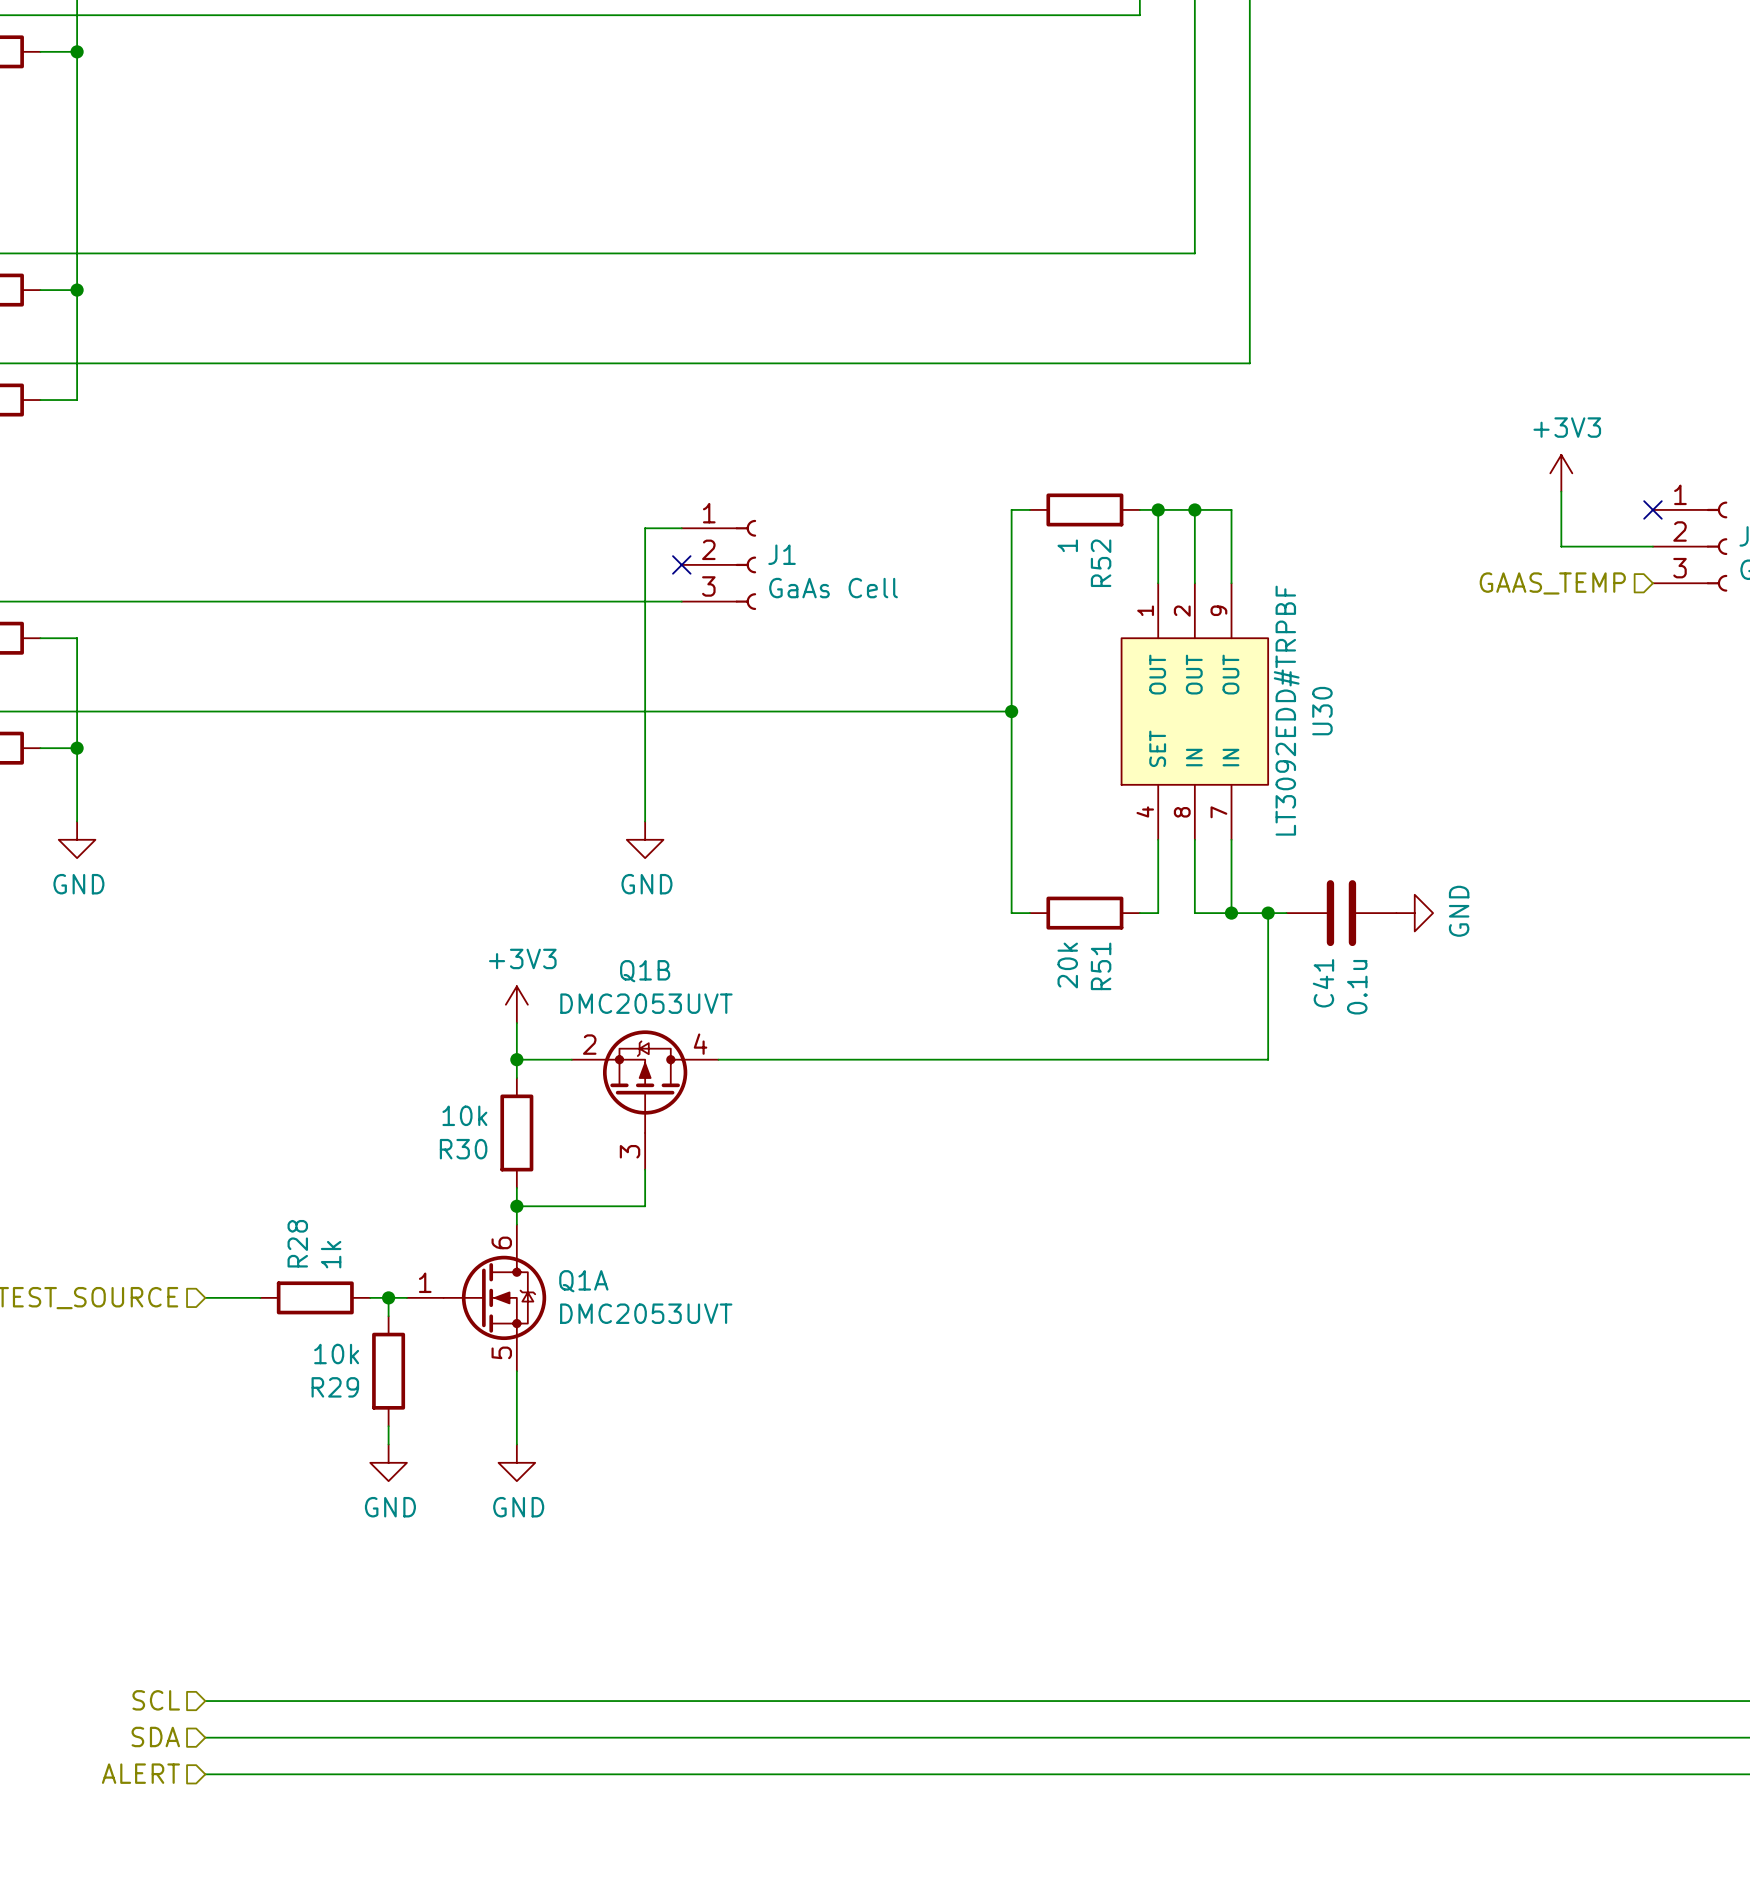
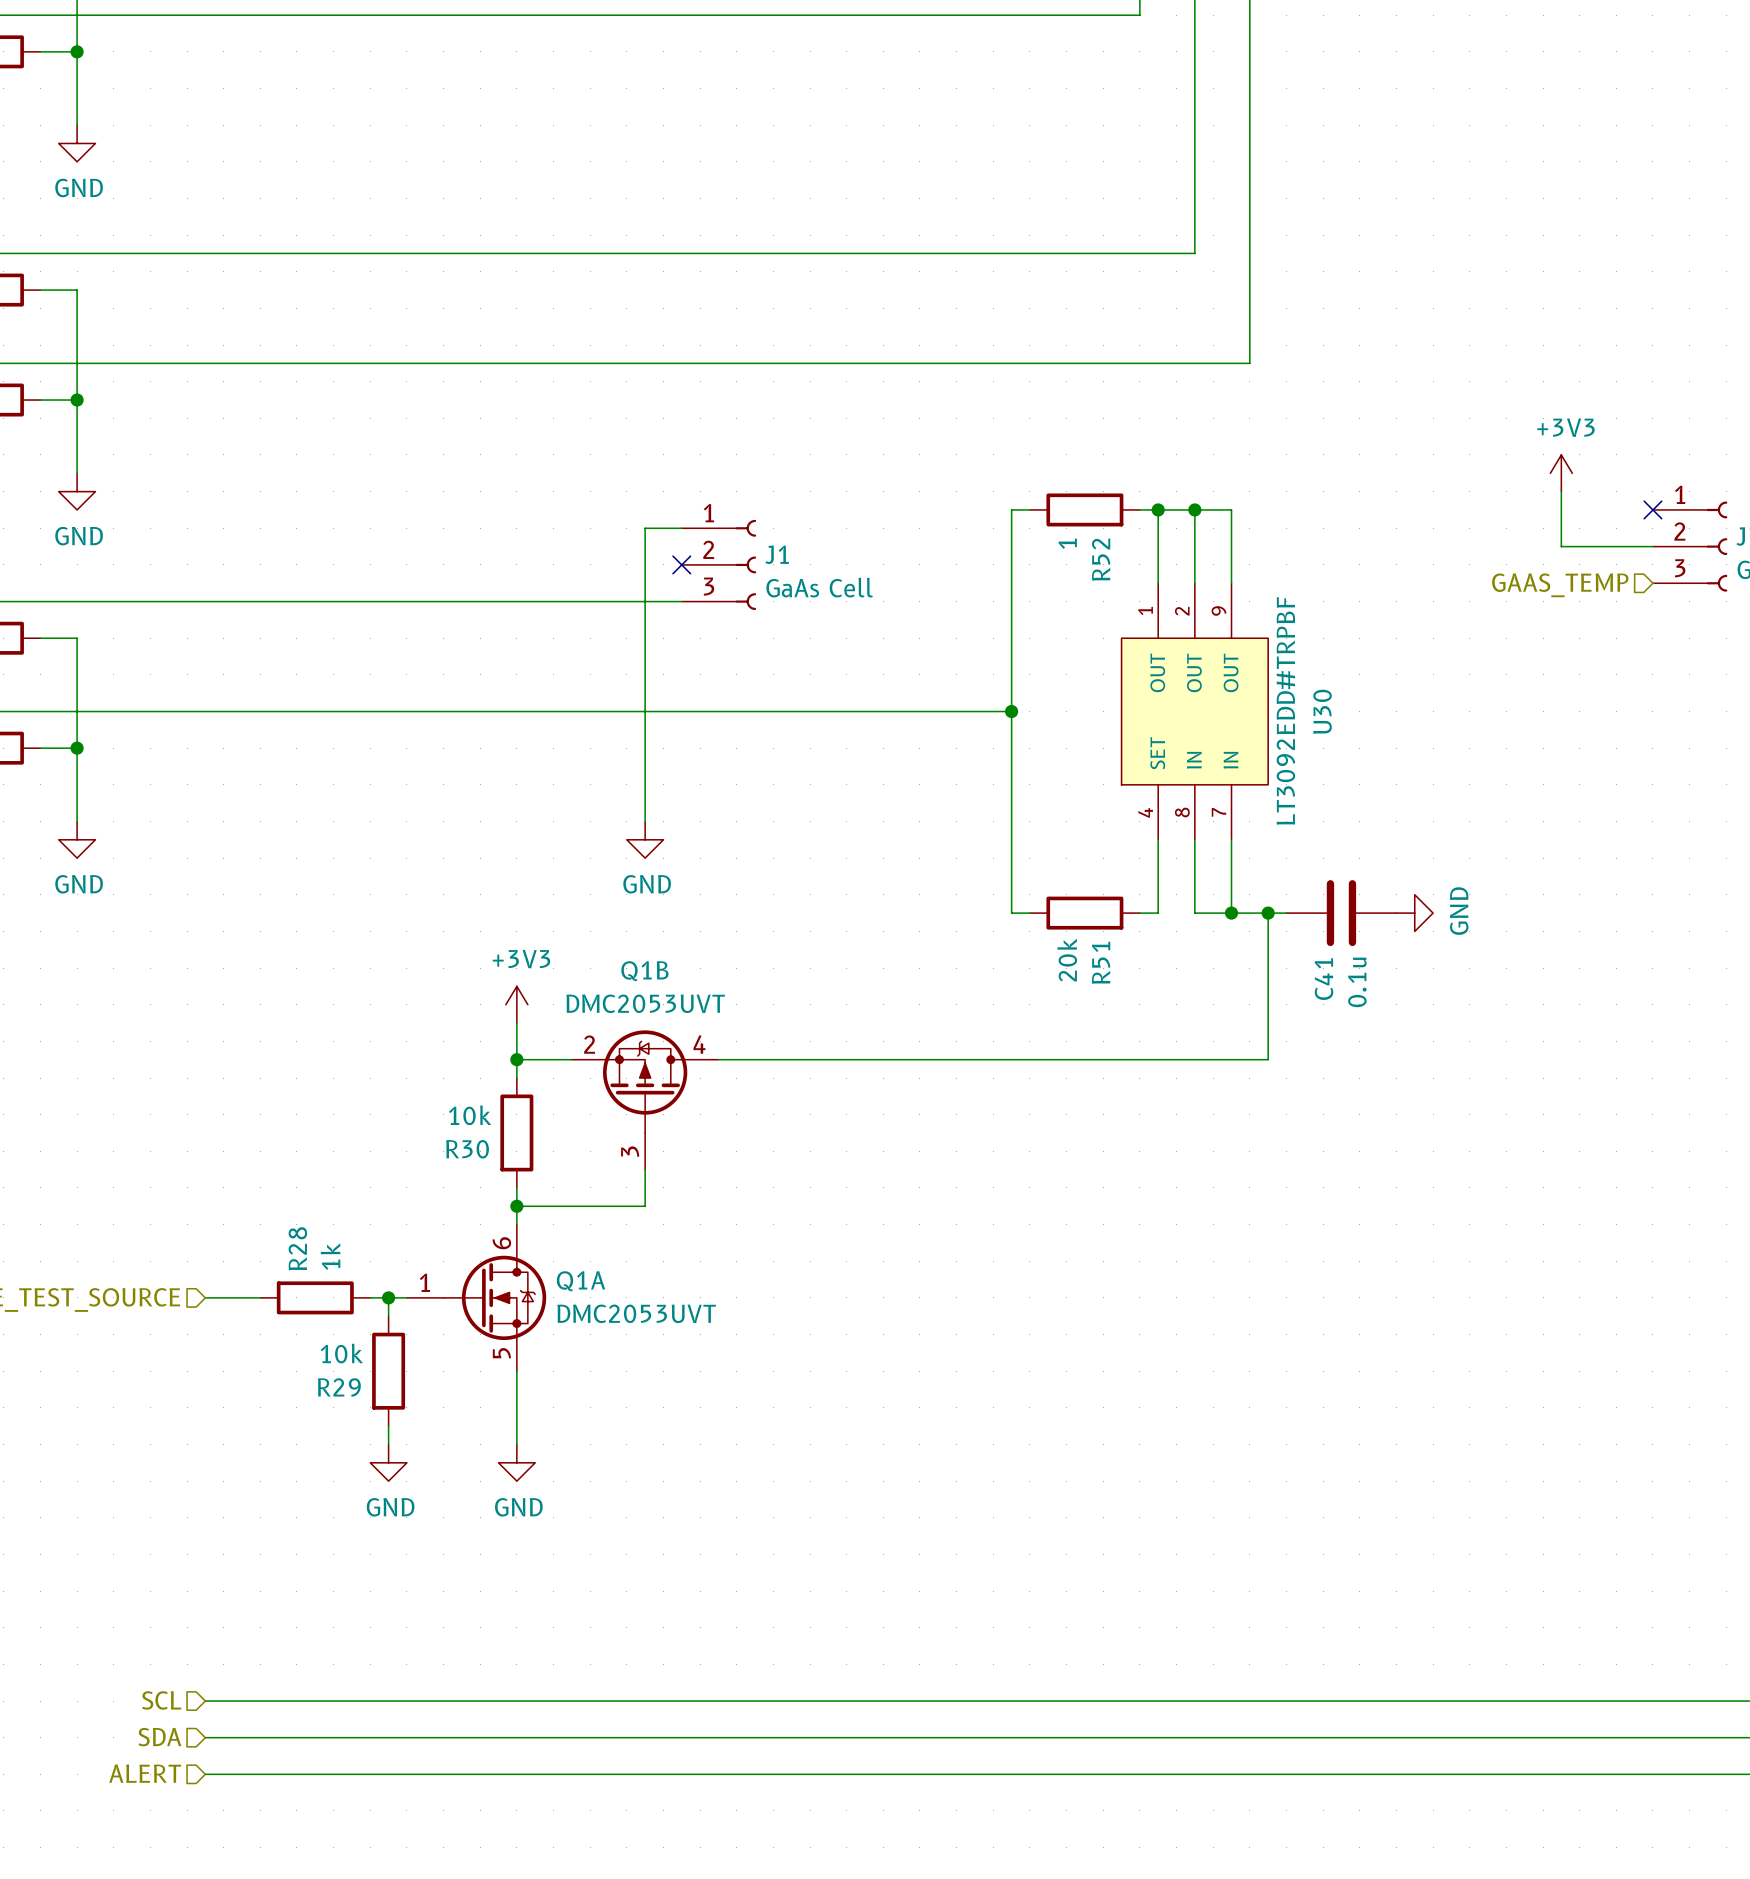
wire: (77, 125) (77, 290) -> none
power symbol: none -> GND (77, 143)
junction: (77, 290) -> none
wire: none -> (77, 400) (77, 473)
junction: none -> (77, 400)
power symbol: none -> GND (77, 491)

